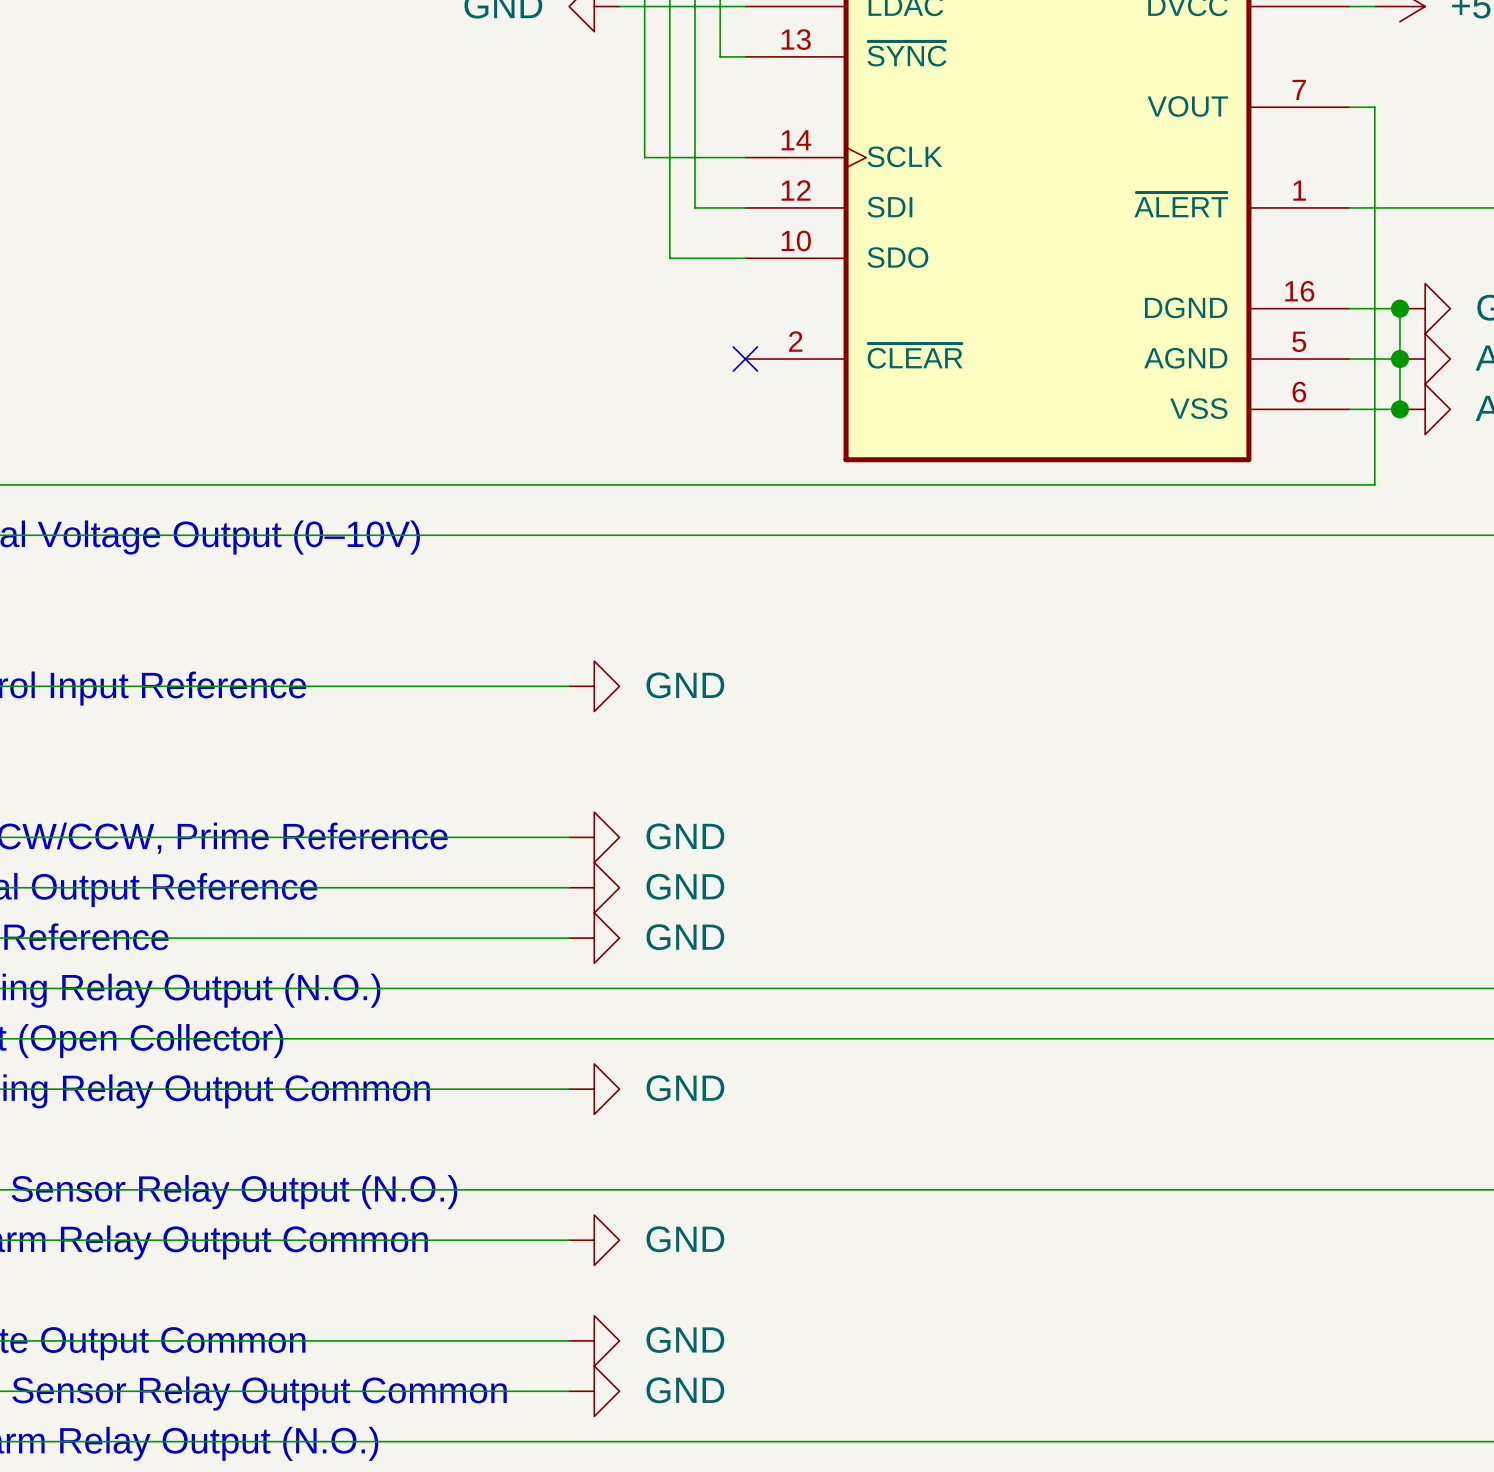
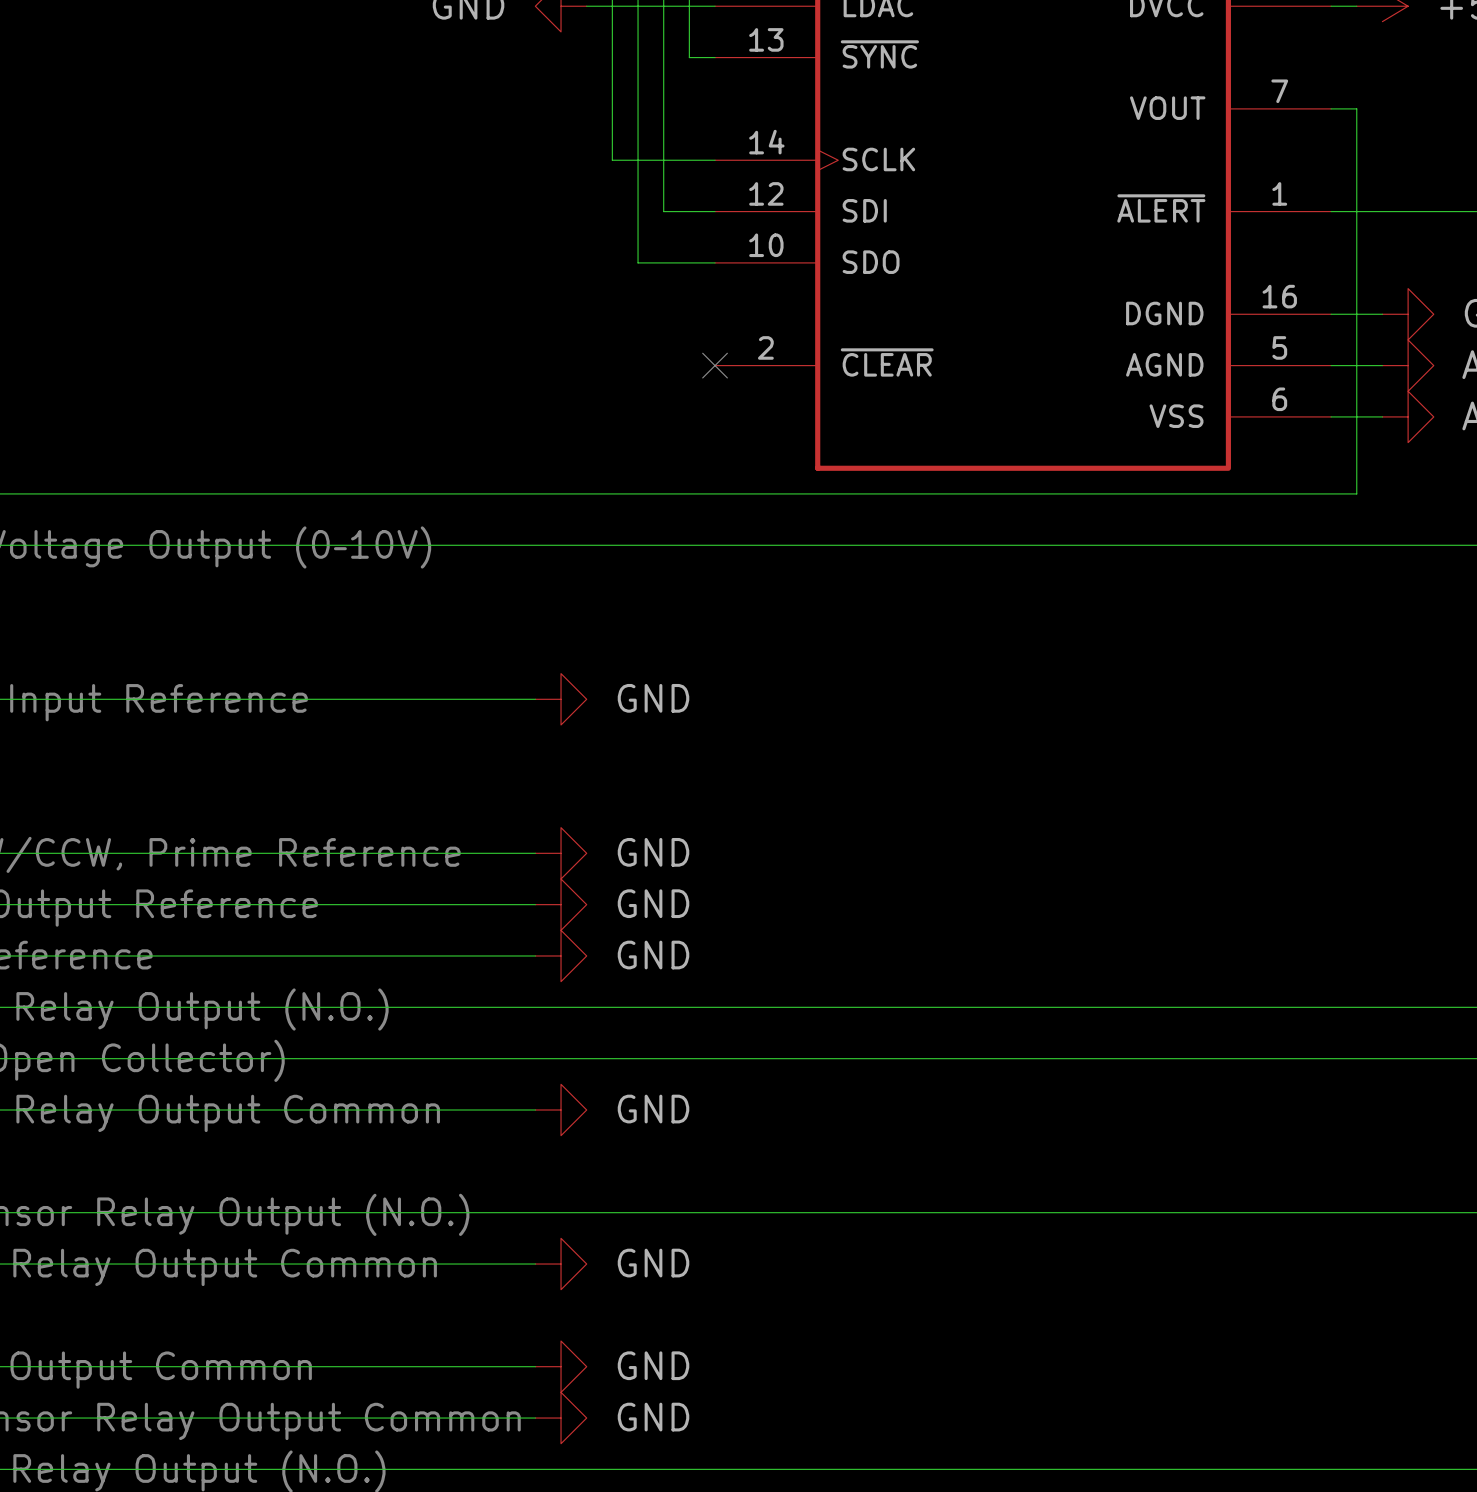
wire: (1399, 308) (1399, 409) -> none
junction: (1399, 308) -> none
junction: (1399, 359) -> none
junction: (1399, 409) -> none

